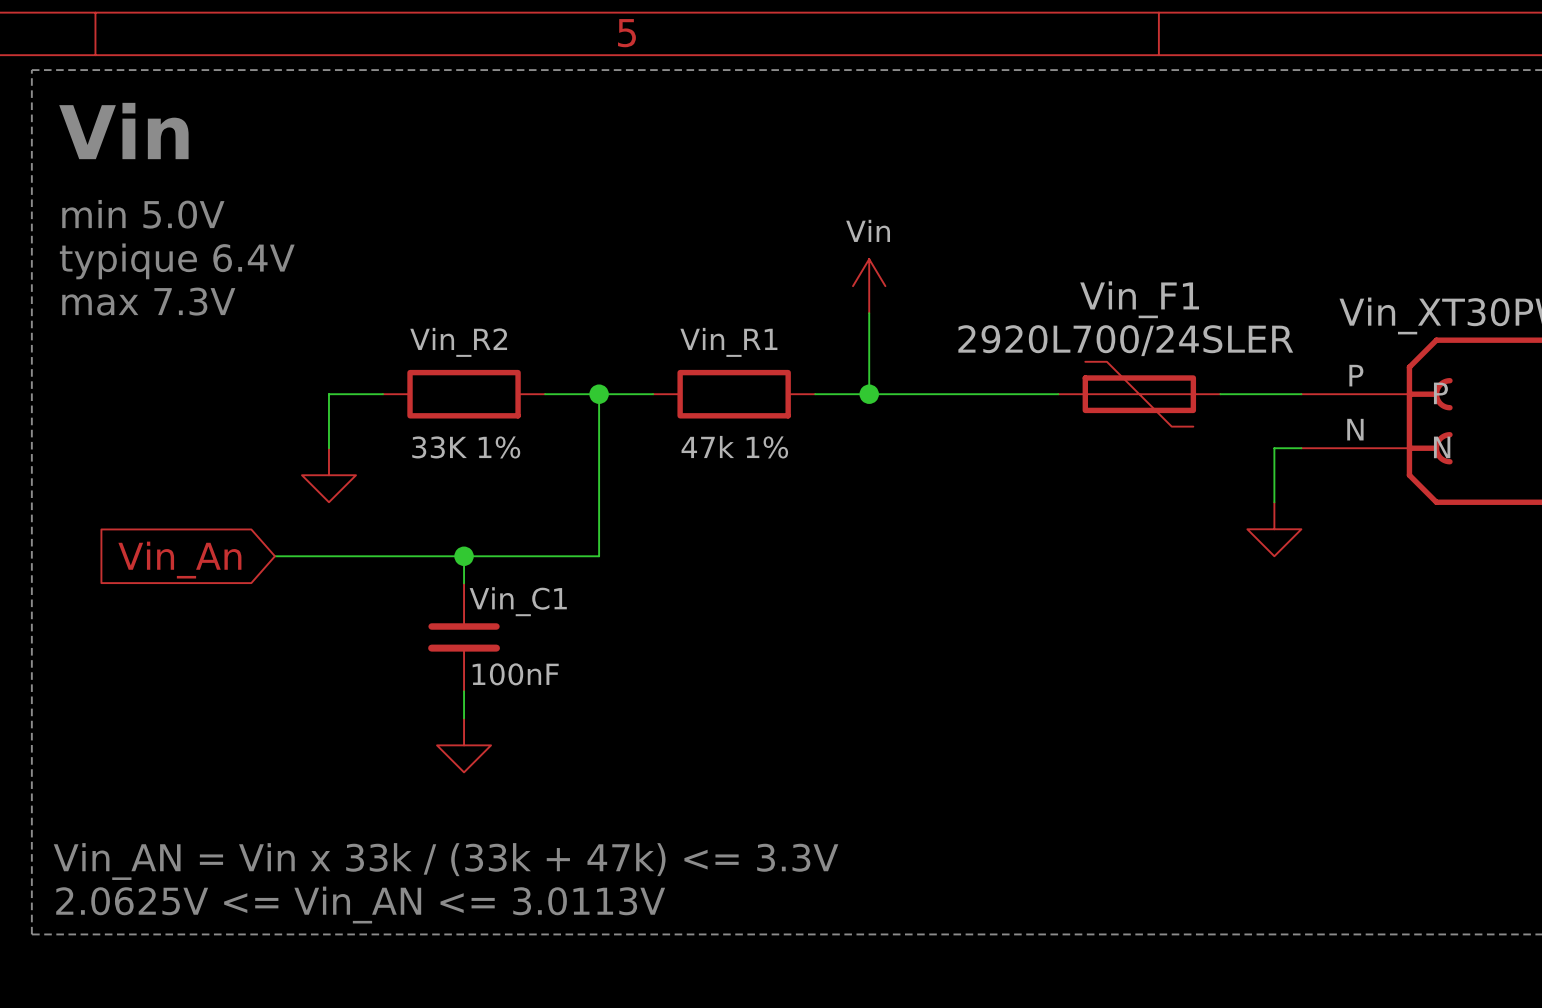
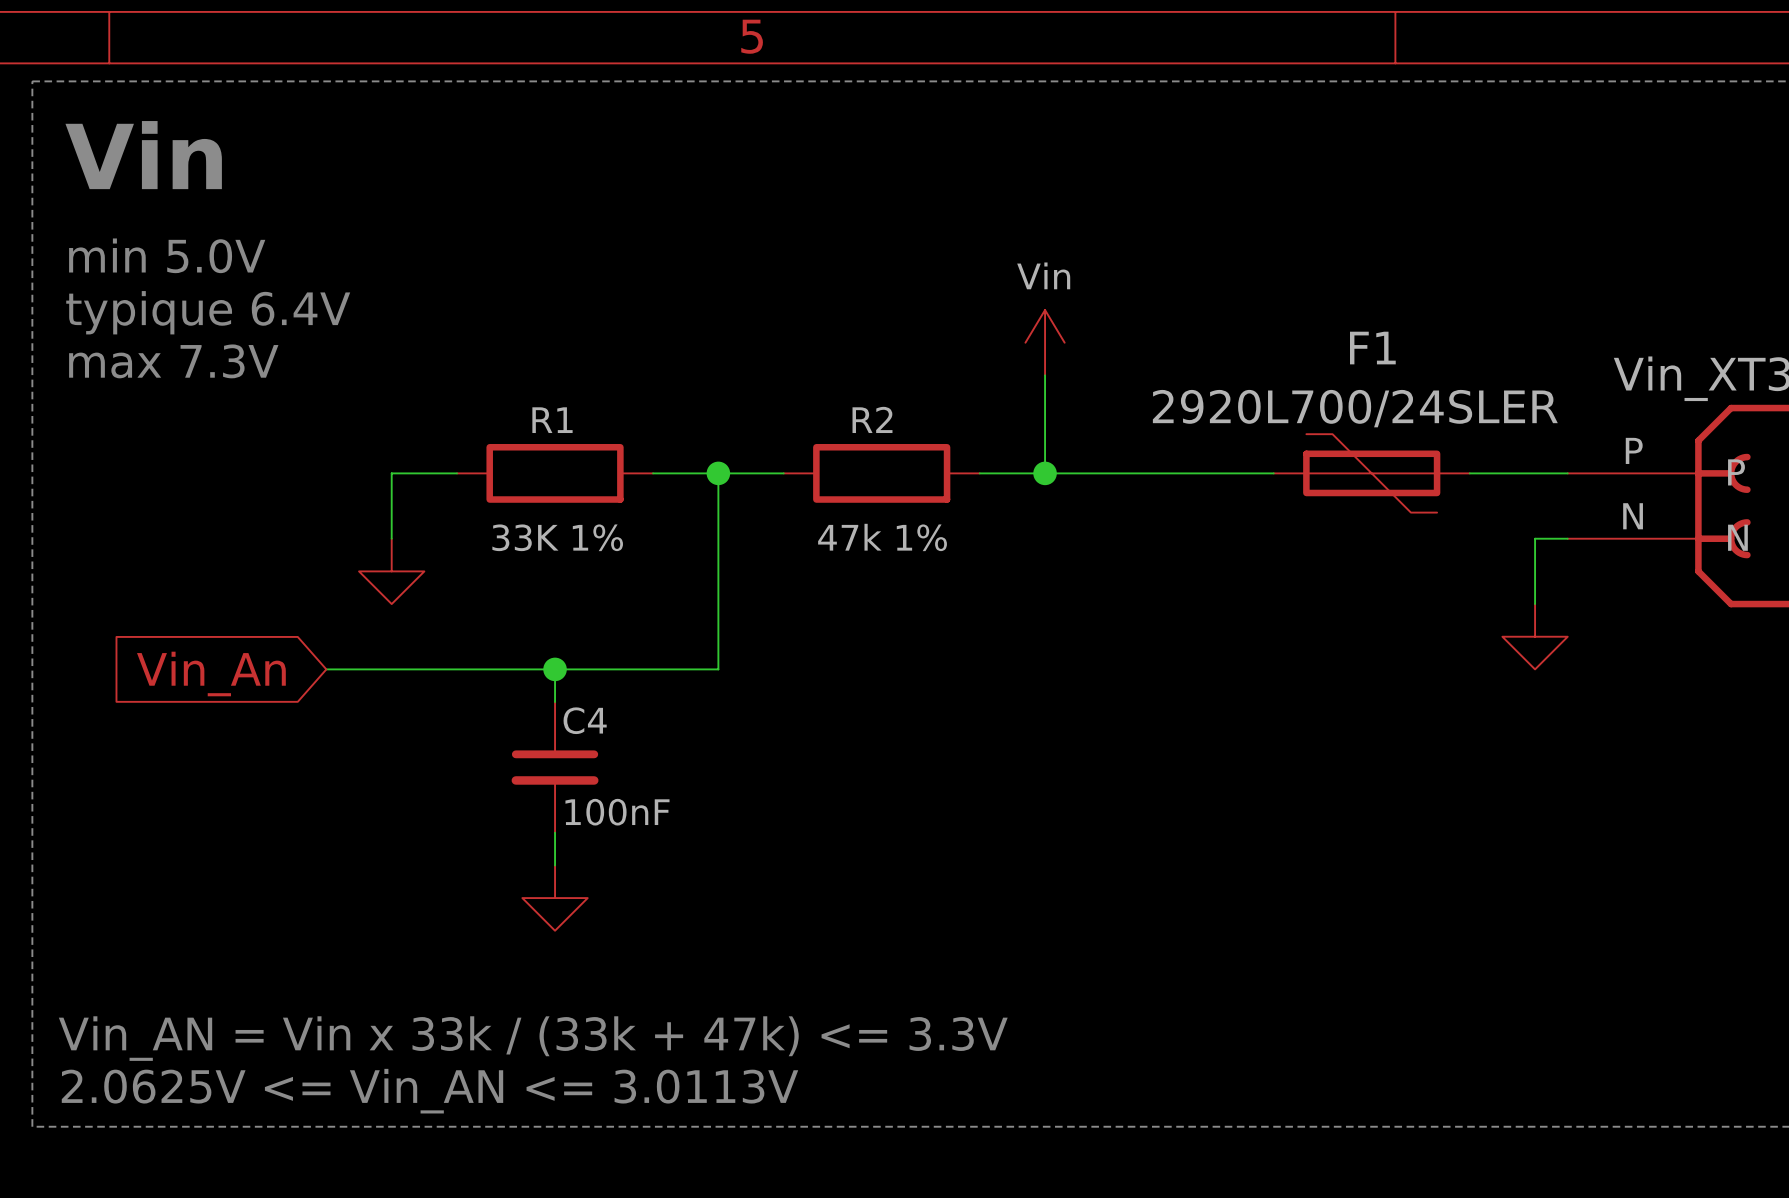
Vin_F1 name: Vin_F1 (1139, 299) -> F1 (1372, 348)
Vin_R2 name: Vin_R2 (458, 342) -> R1 (552, 420)
Vin_R1 name: Vin_R1 (728, 342) -> R2 (872, 419)
Vin_C1 name: Vin_C1 (518, 601) -> C4 (585, 720)

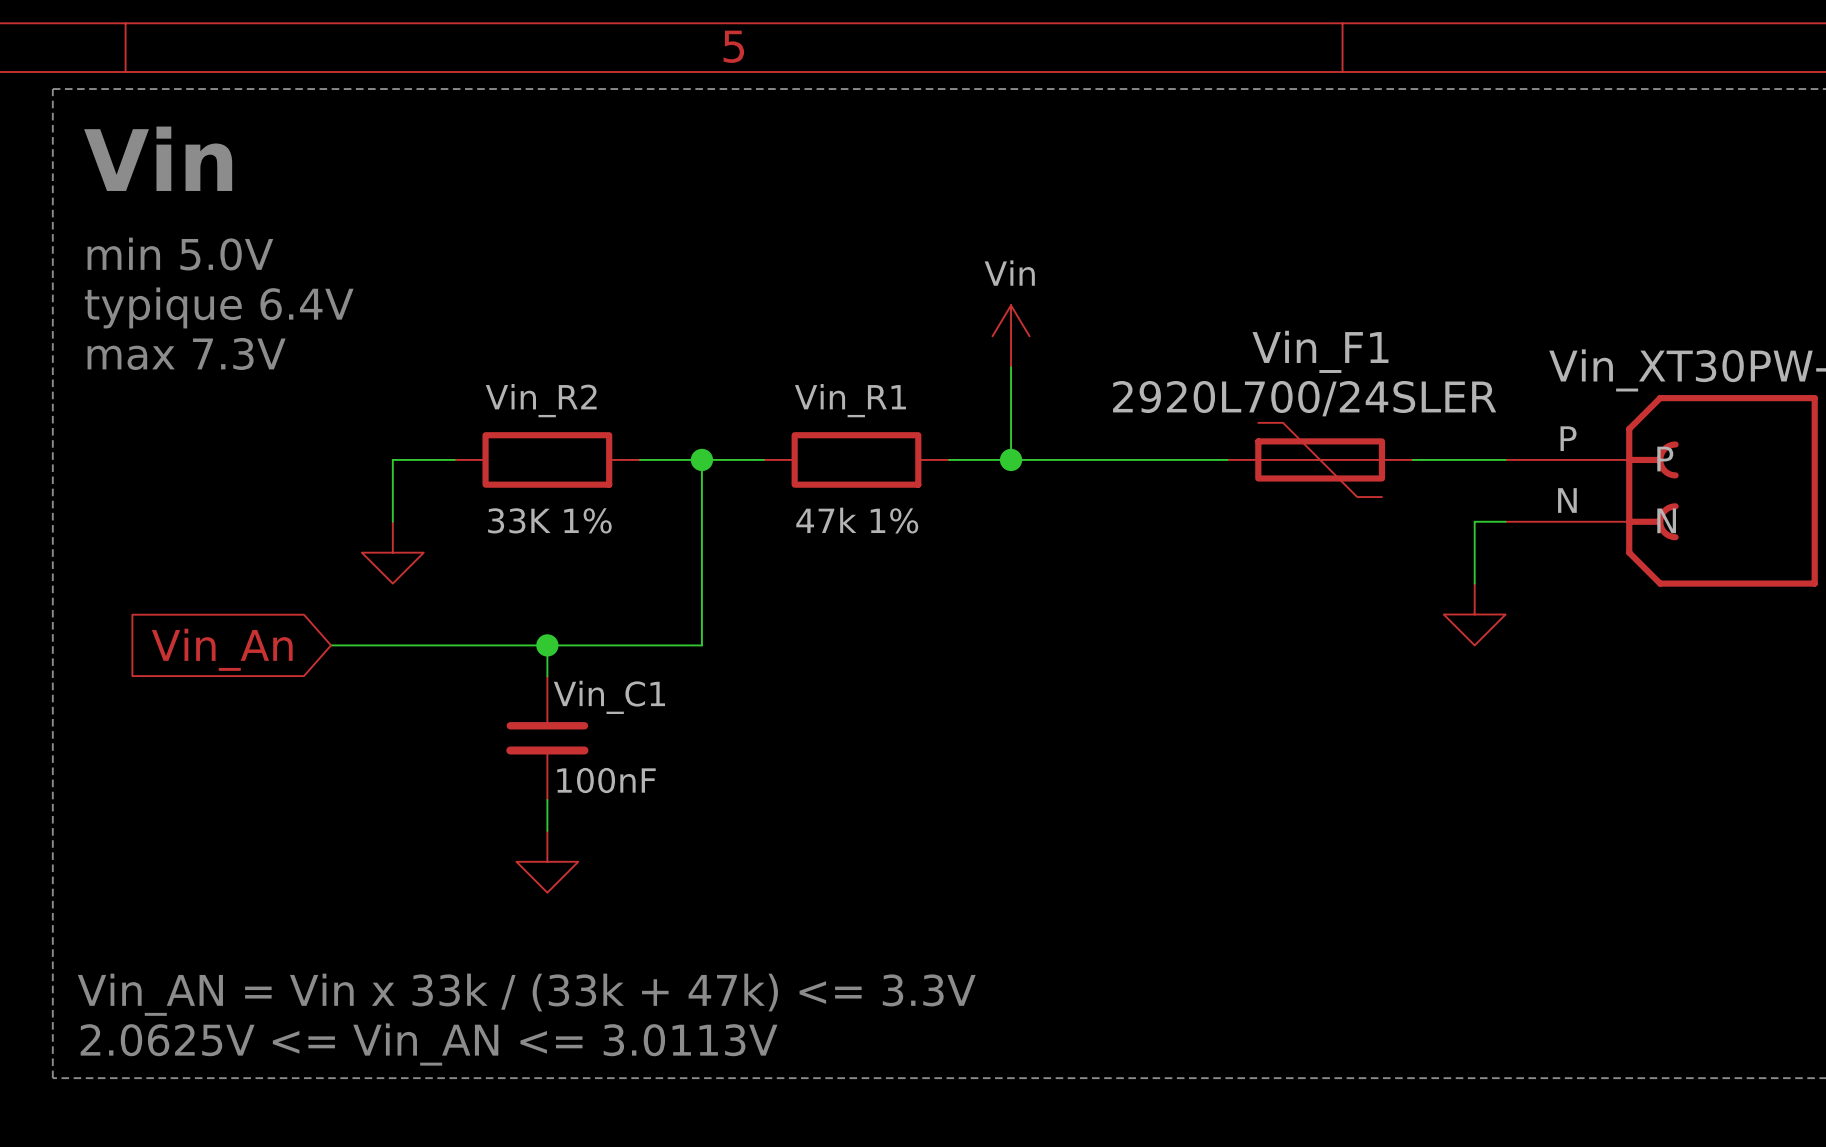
F1 name: F1 (1372, 348) -> Vin_F1 (1320, 351)
R2 name: R2 (872, 419) -> Vin_R1 (850, 400)
R1 name: R1 (552, 420) -> Vin_R2 (541, 400)
C4 name: C4 (585, 720) -> Vin_C1 (609, 697)

